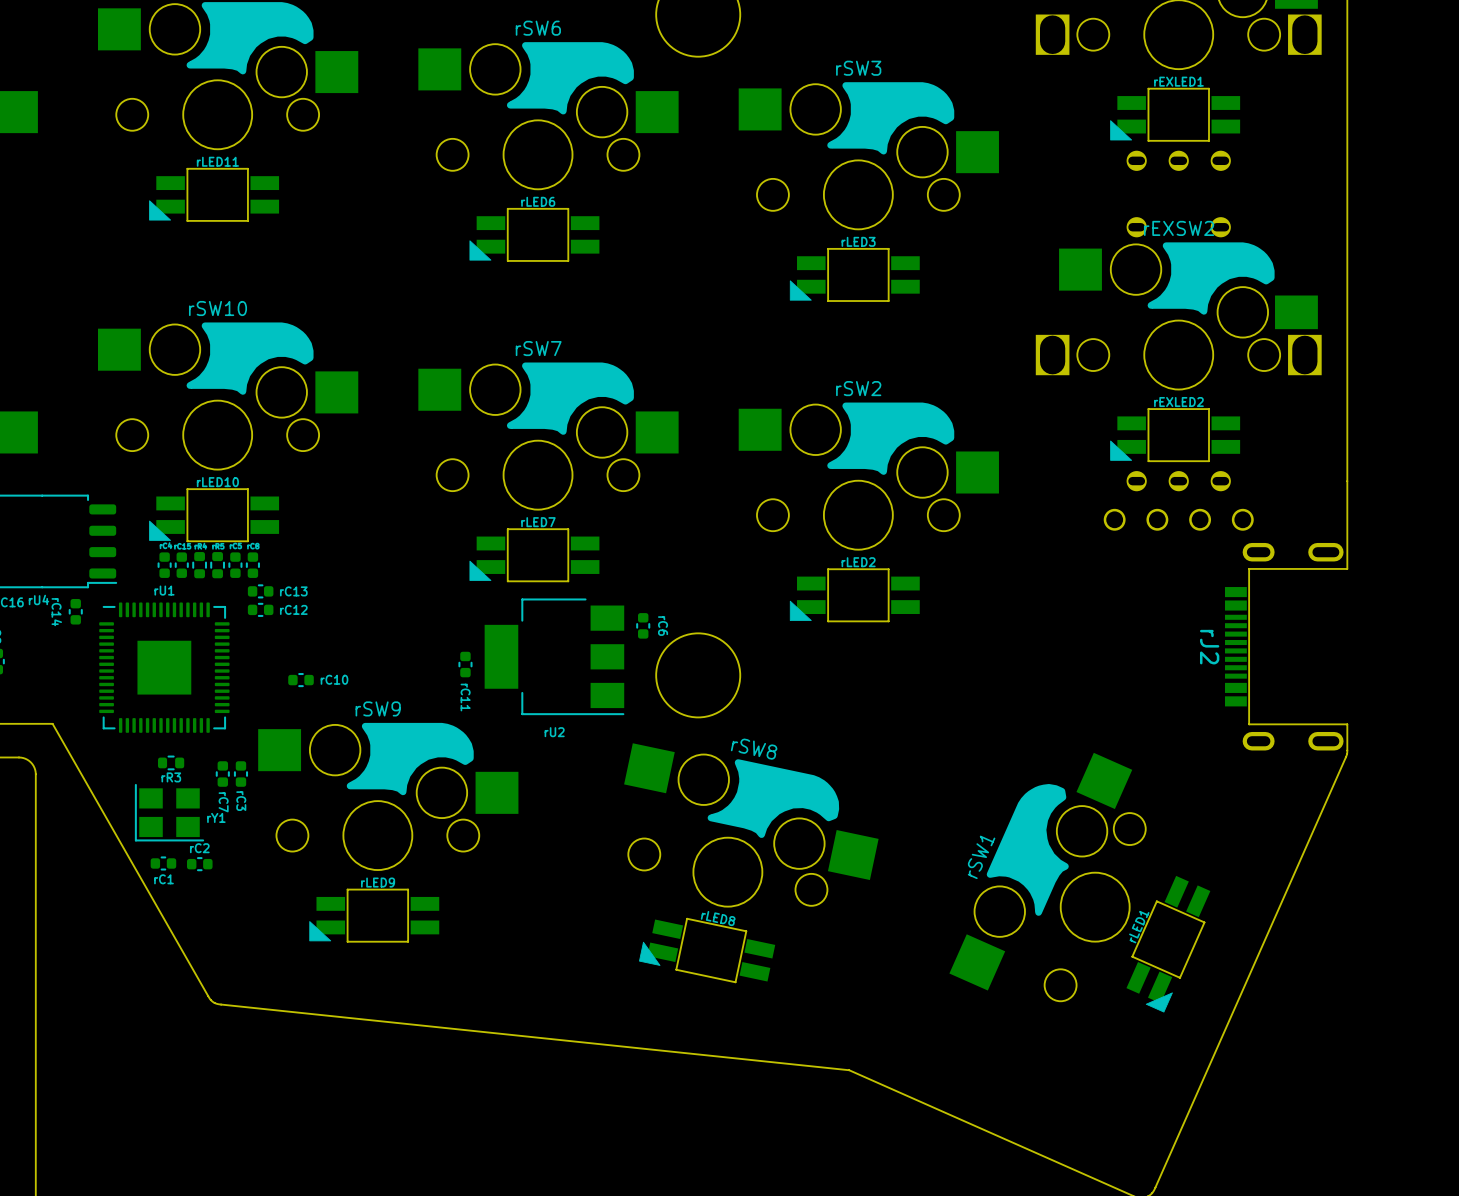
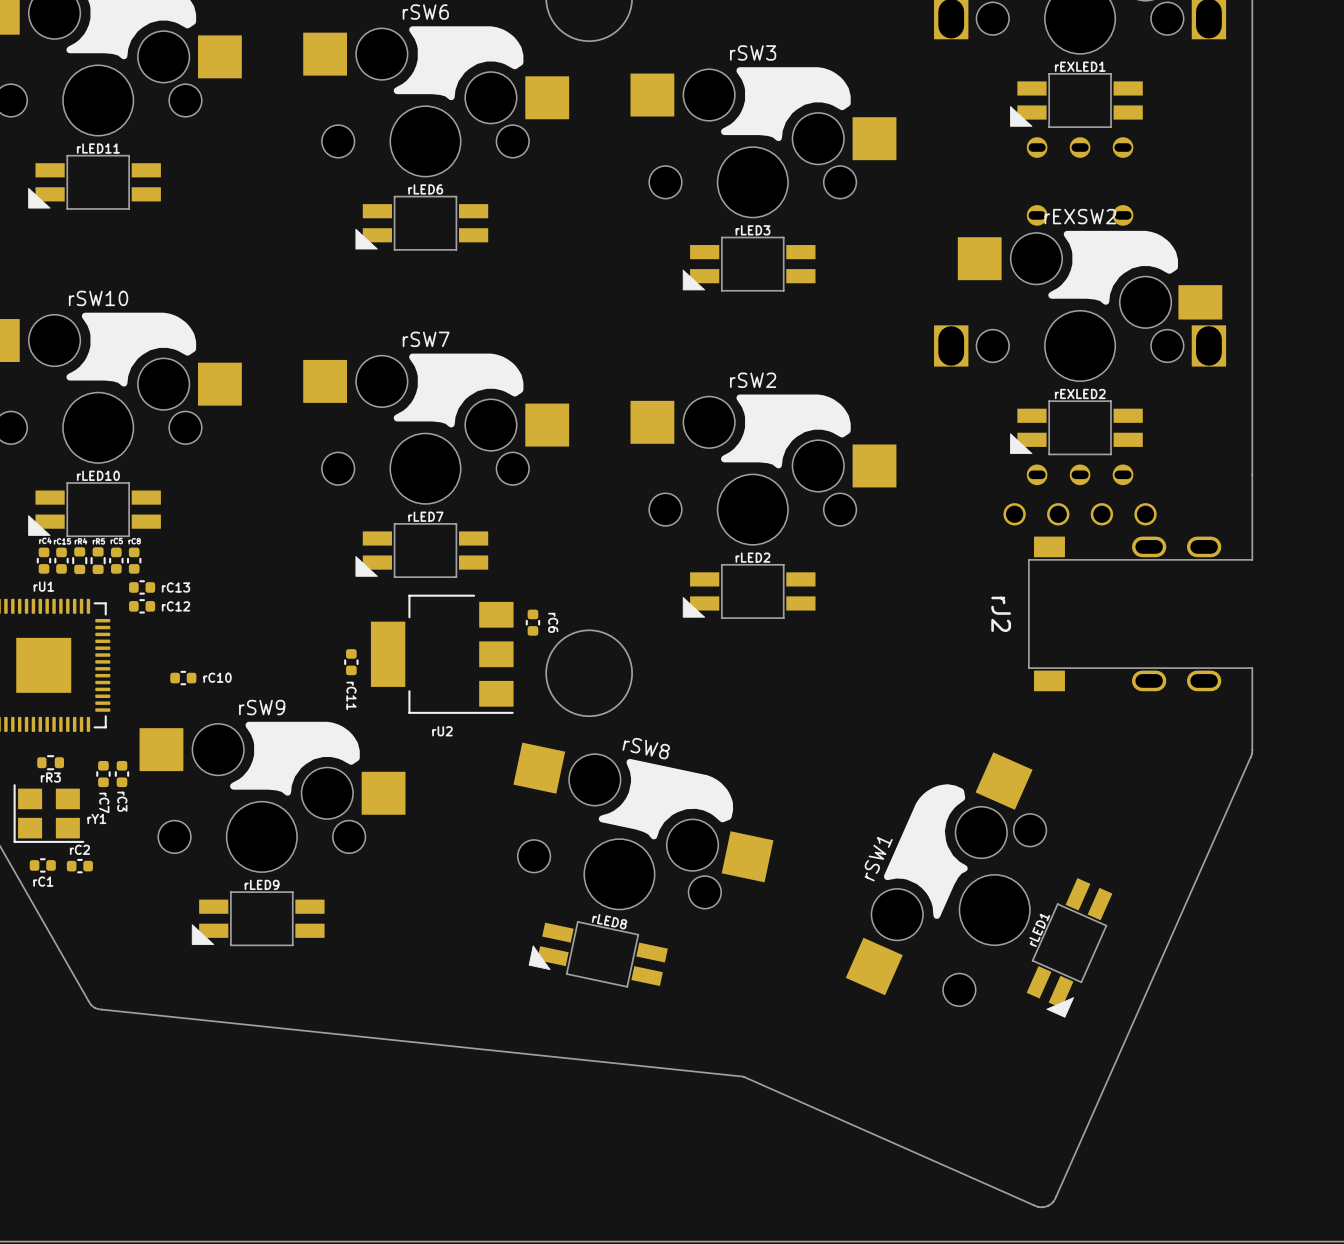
rJ2 footprint: [1225, 542, 1344, 751] -> [1034, 536, 1222, 692]
board edge: (1347, 564) (1347, 568) (1249, 568) (1249, 724) (1347, 724) -> (1252, 559) (1028, 559) (1028, 668) (1252, 668) (1252, 723)
rJ2 name position: rJ2 (1209, 647) -> rJ2 (1001, 614)

